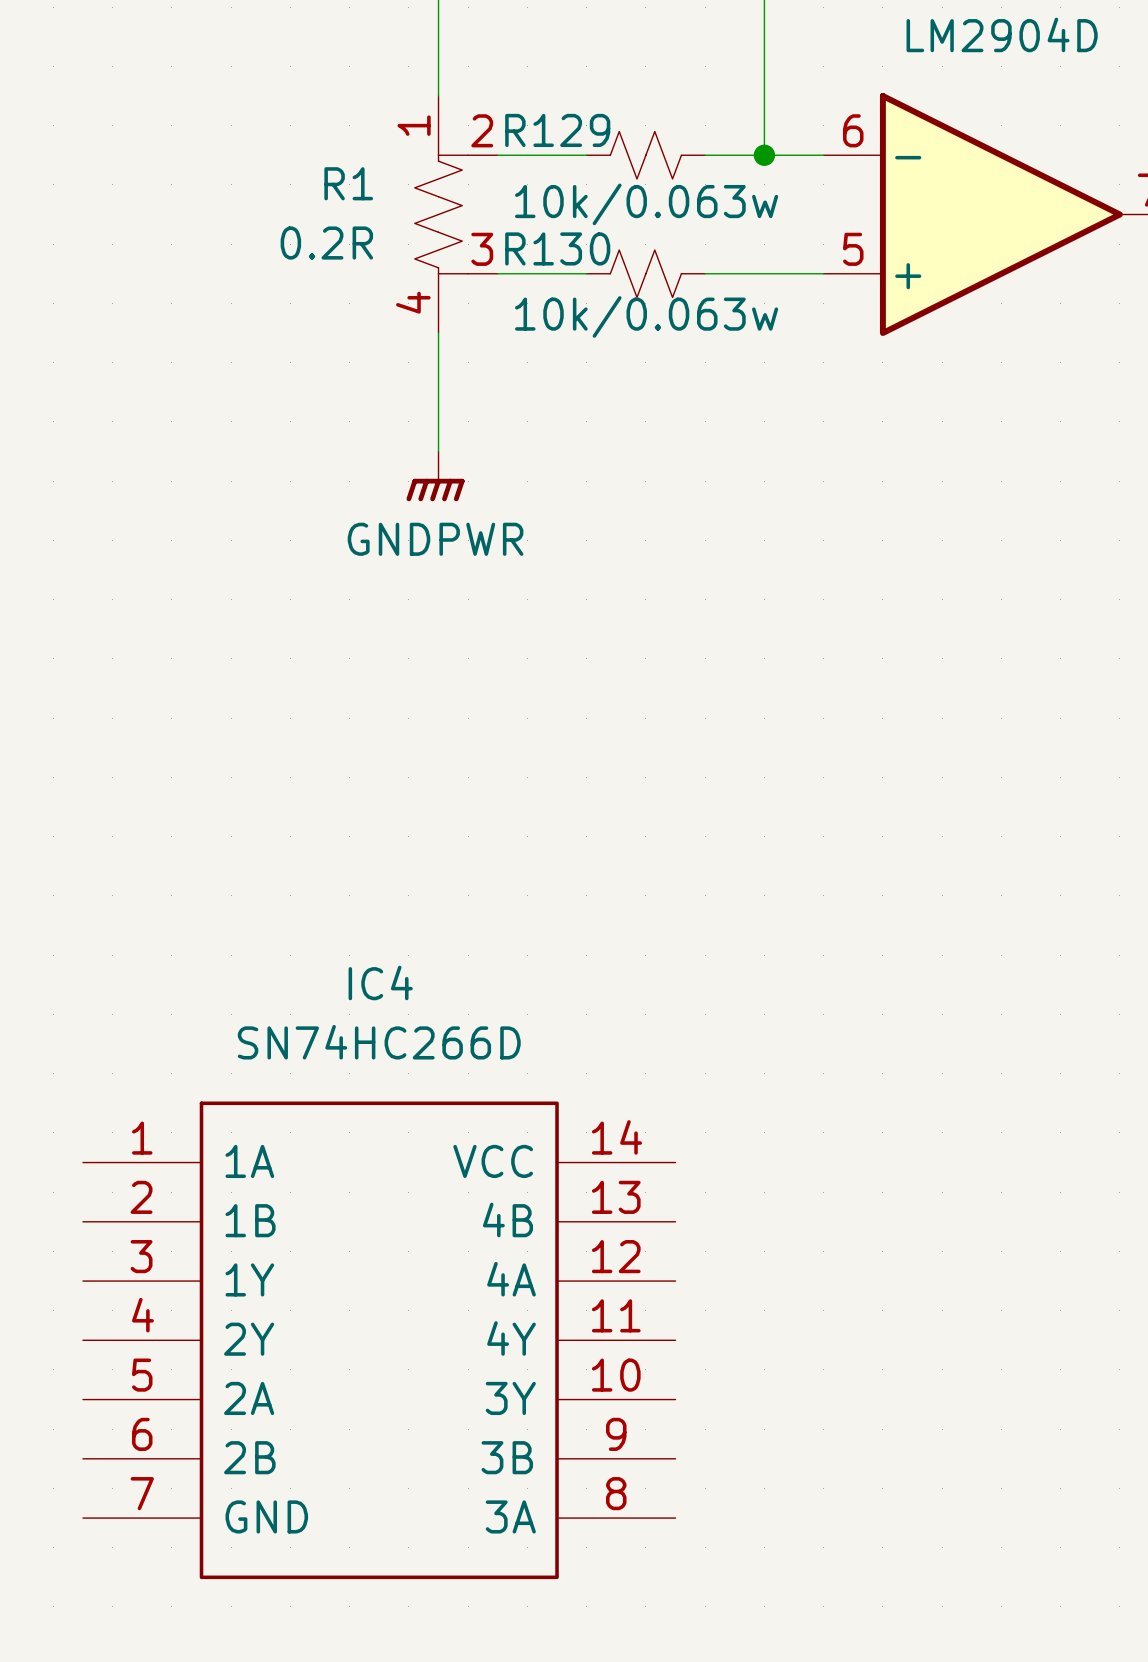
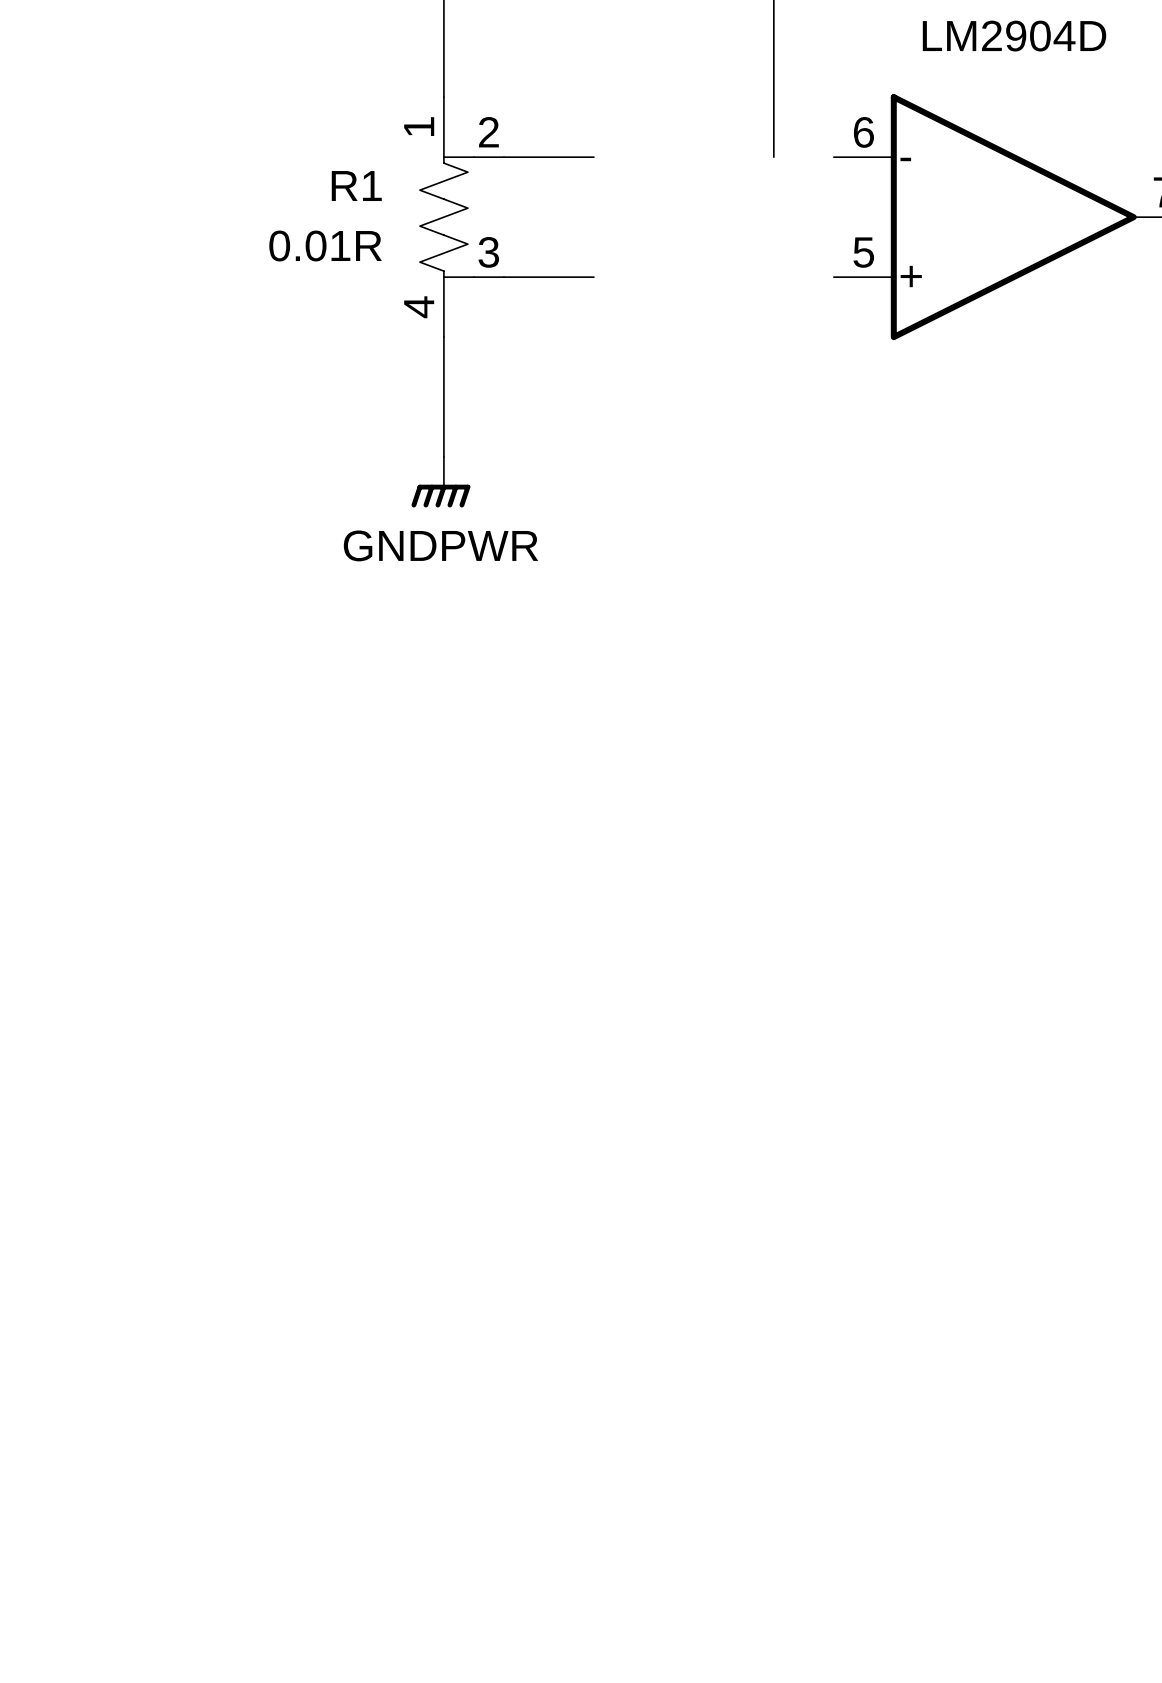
R129: 10k/0.063w (645, 155) -> none
wire: (705, 155) (823, 155) -> none
junction: (764, 155) -> none
R1 value: 0.2R (326, 243) -> 0.01R (325, 246)
R130: 10k/0.063w (645, 273) -> none
wire: (705, 273) (823, 273) -> none
IC4: SN74HC266D (379, 1340) -> none

